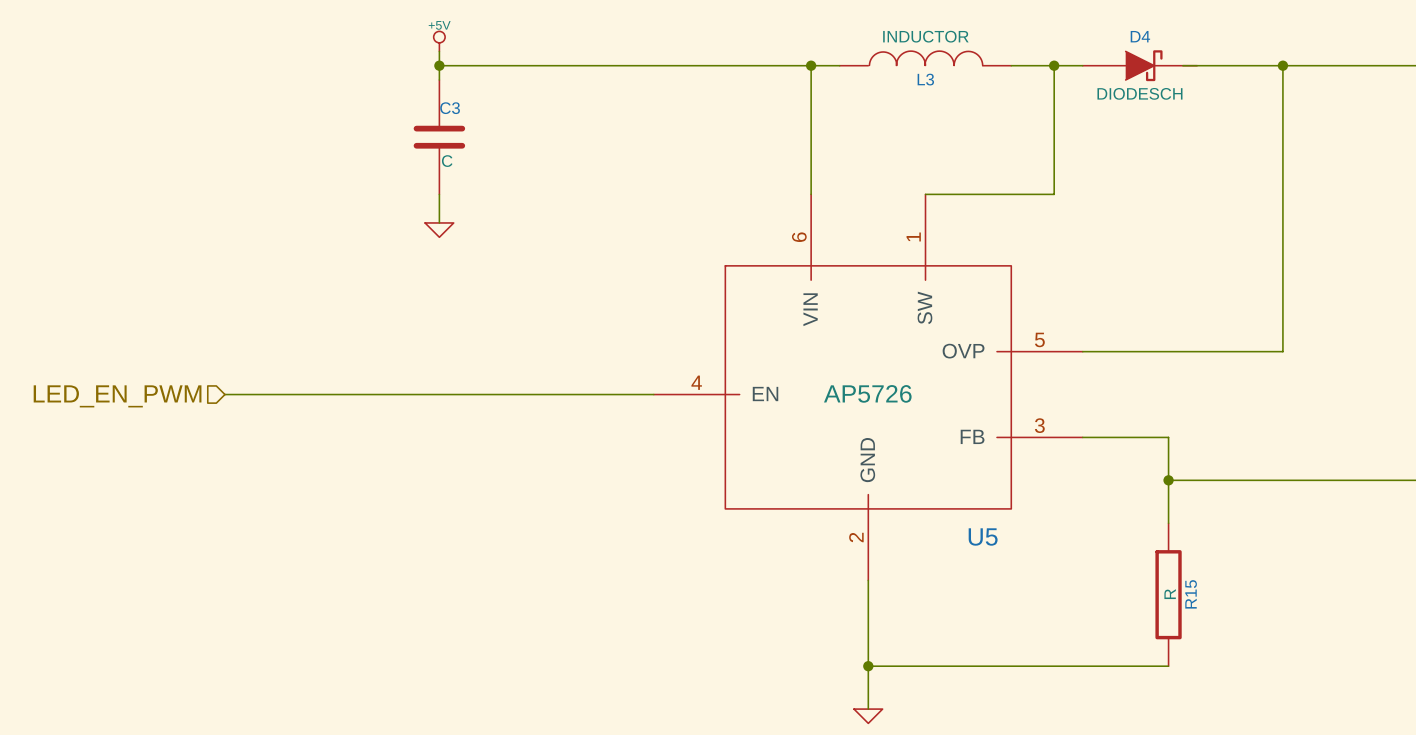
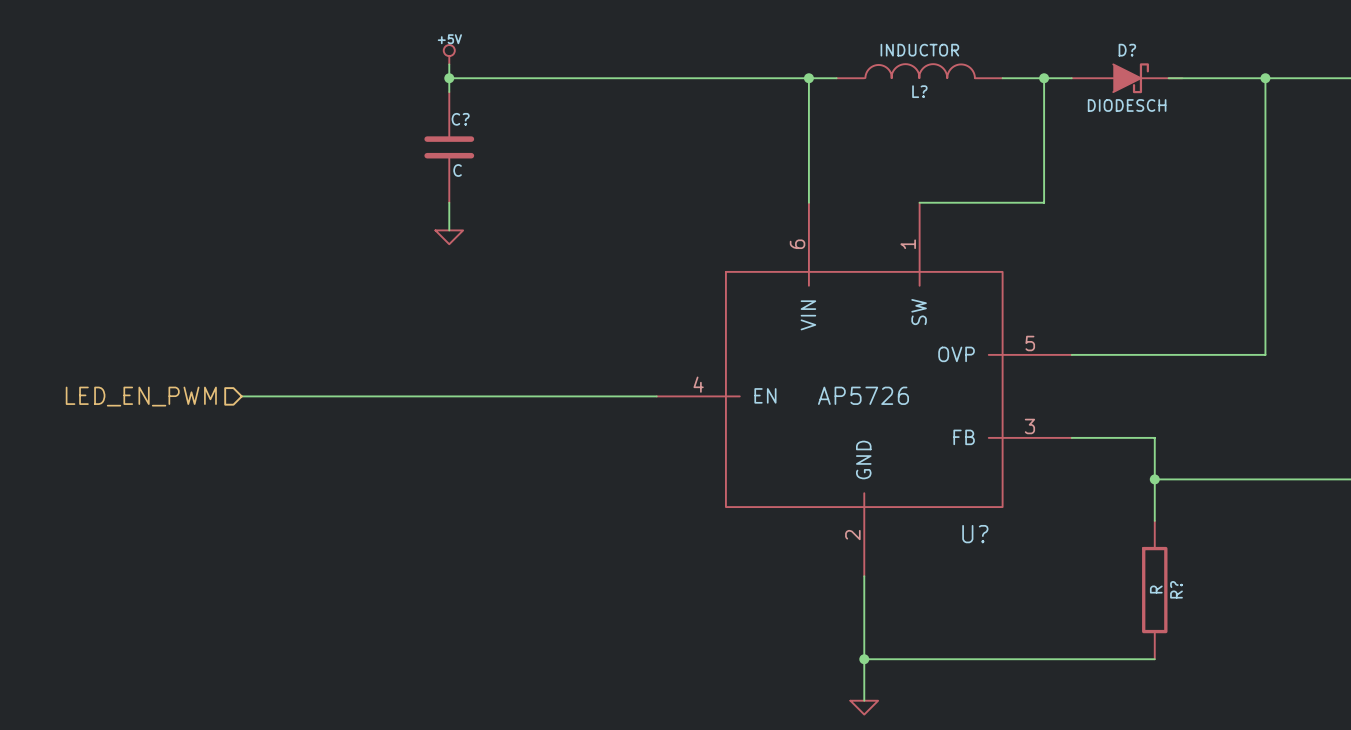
D4 name: D4 (1140, 36) -> D? (1127, 50)
L3 name: L3 (925, 79) -> L? (919, 91)
C3 name: C3 (450, 108) -> C? (460, 119)
U5 name: U5 (983, 536) -> U? (975, 534)
R15 name: R15 (1191, 594) -> R? (1176, 589)

